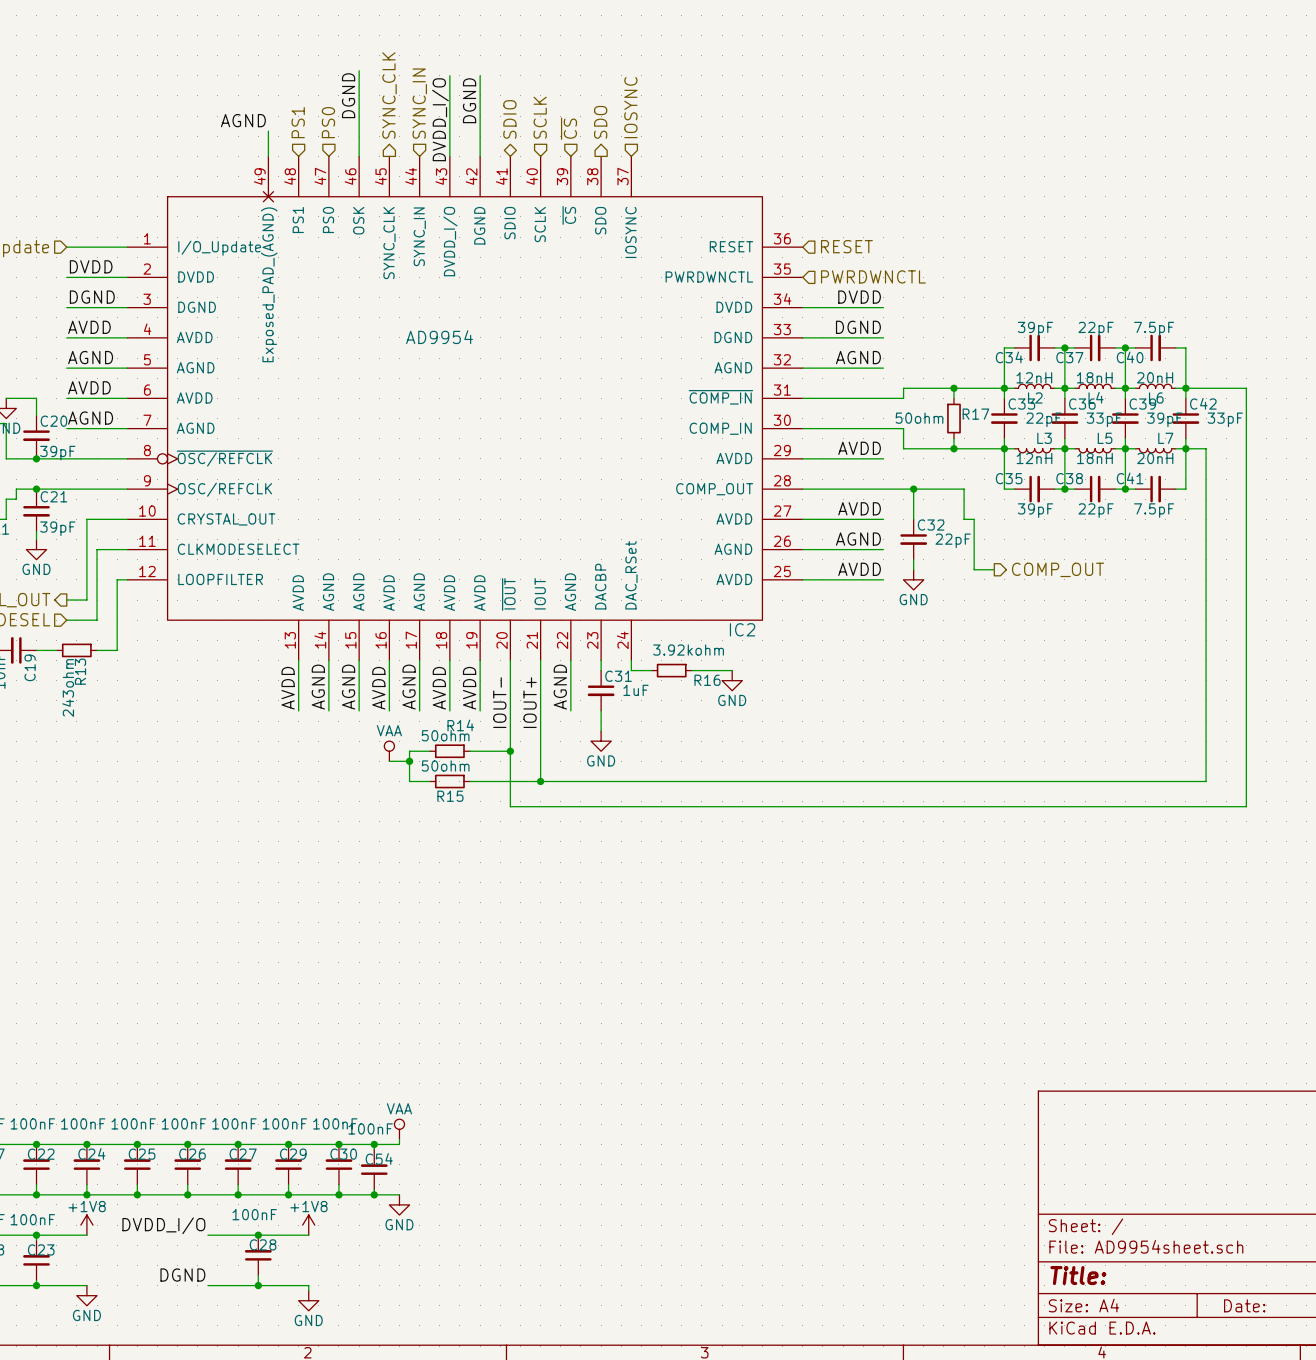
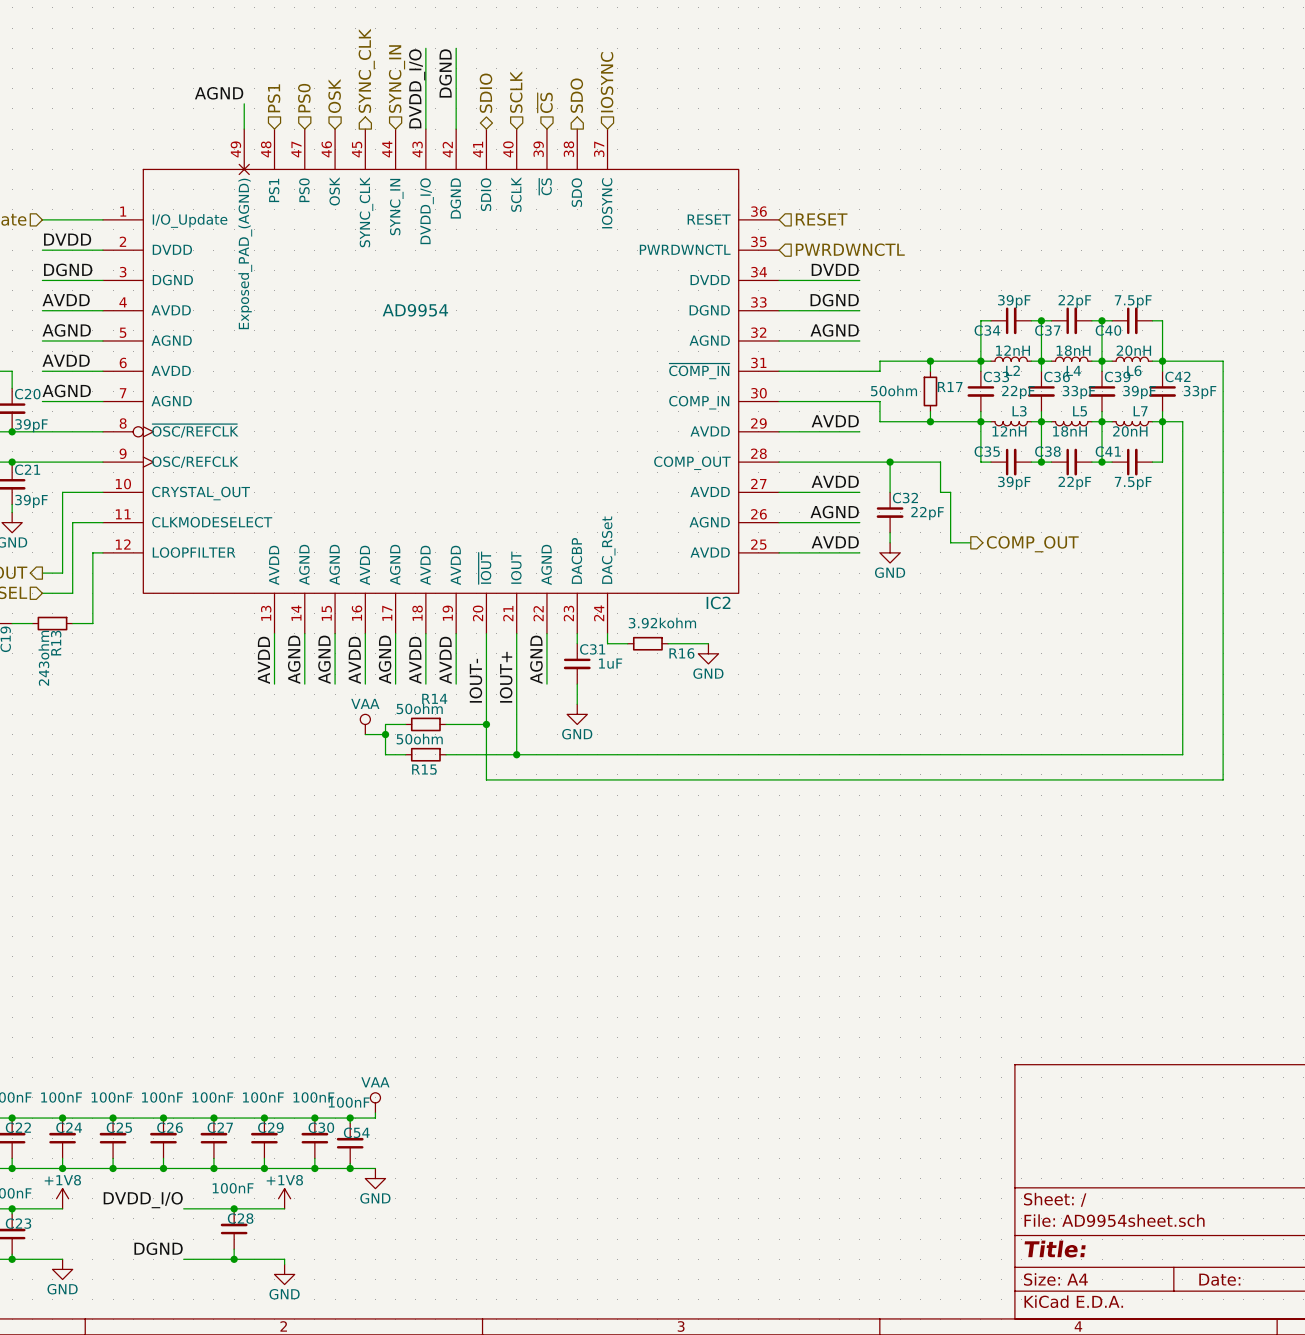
wire: (359, 70) (359, 156) -> none
label: DGND (348, 95) -> none
hierarchical label: none -> OSK (334, 96)

